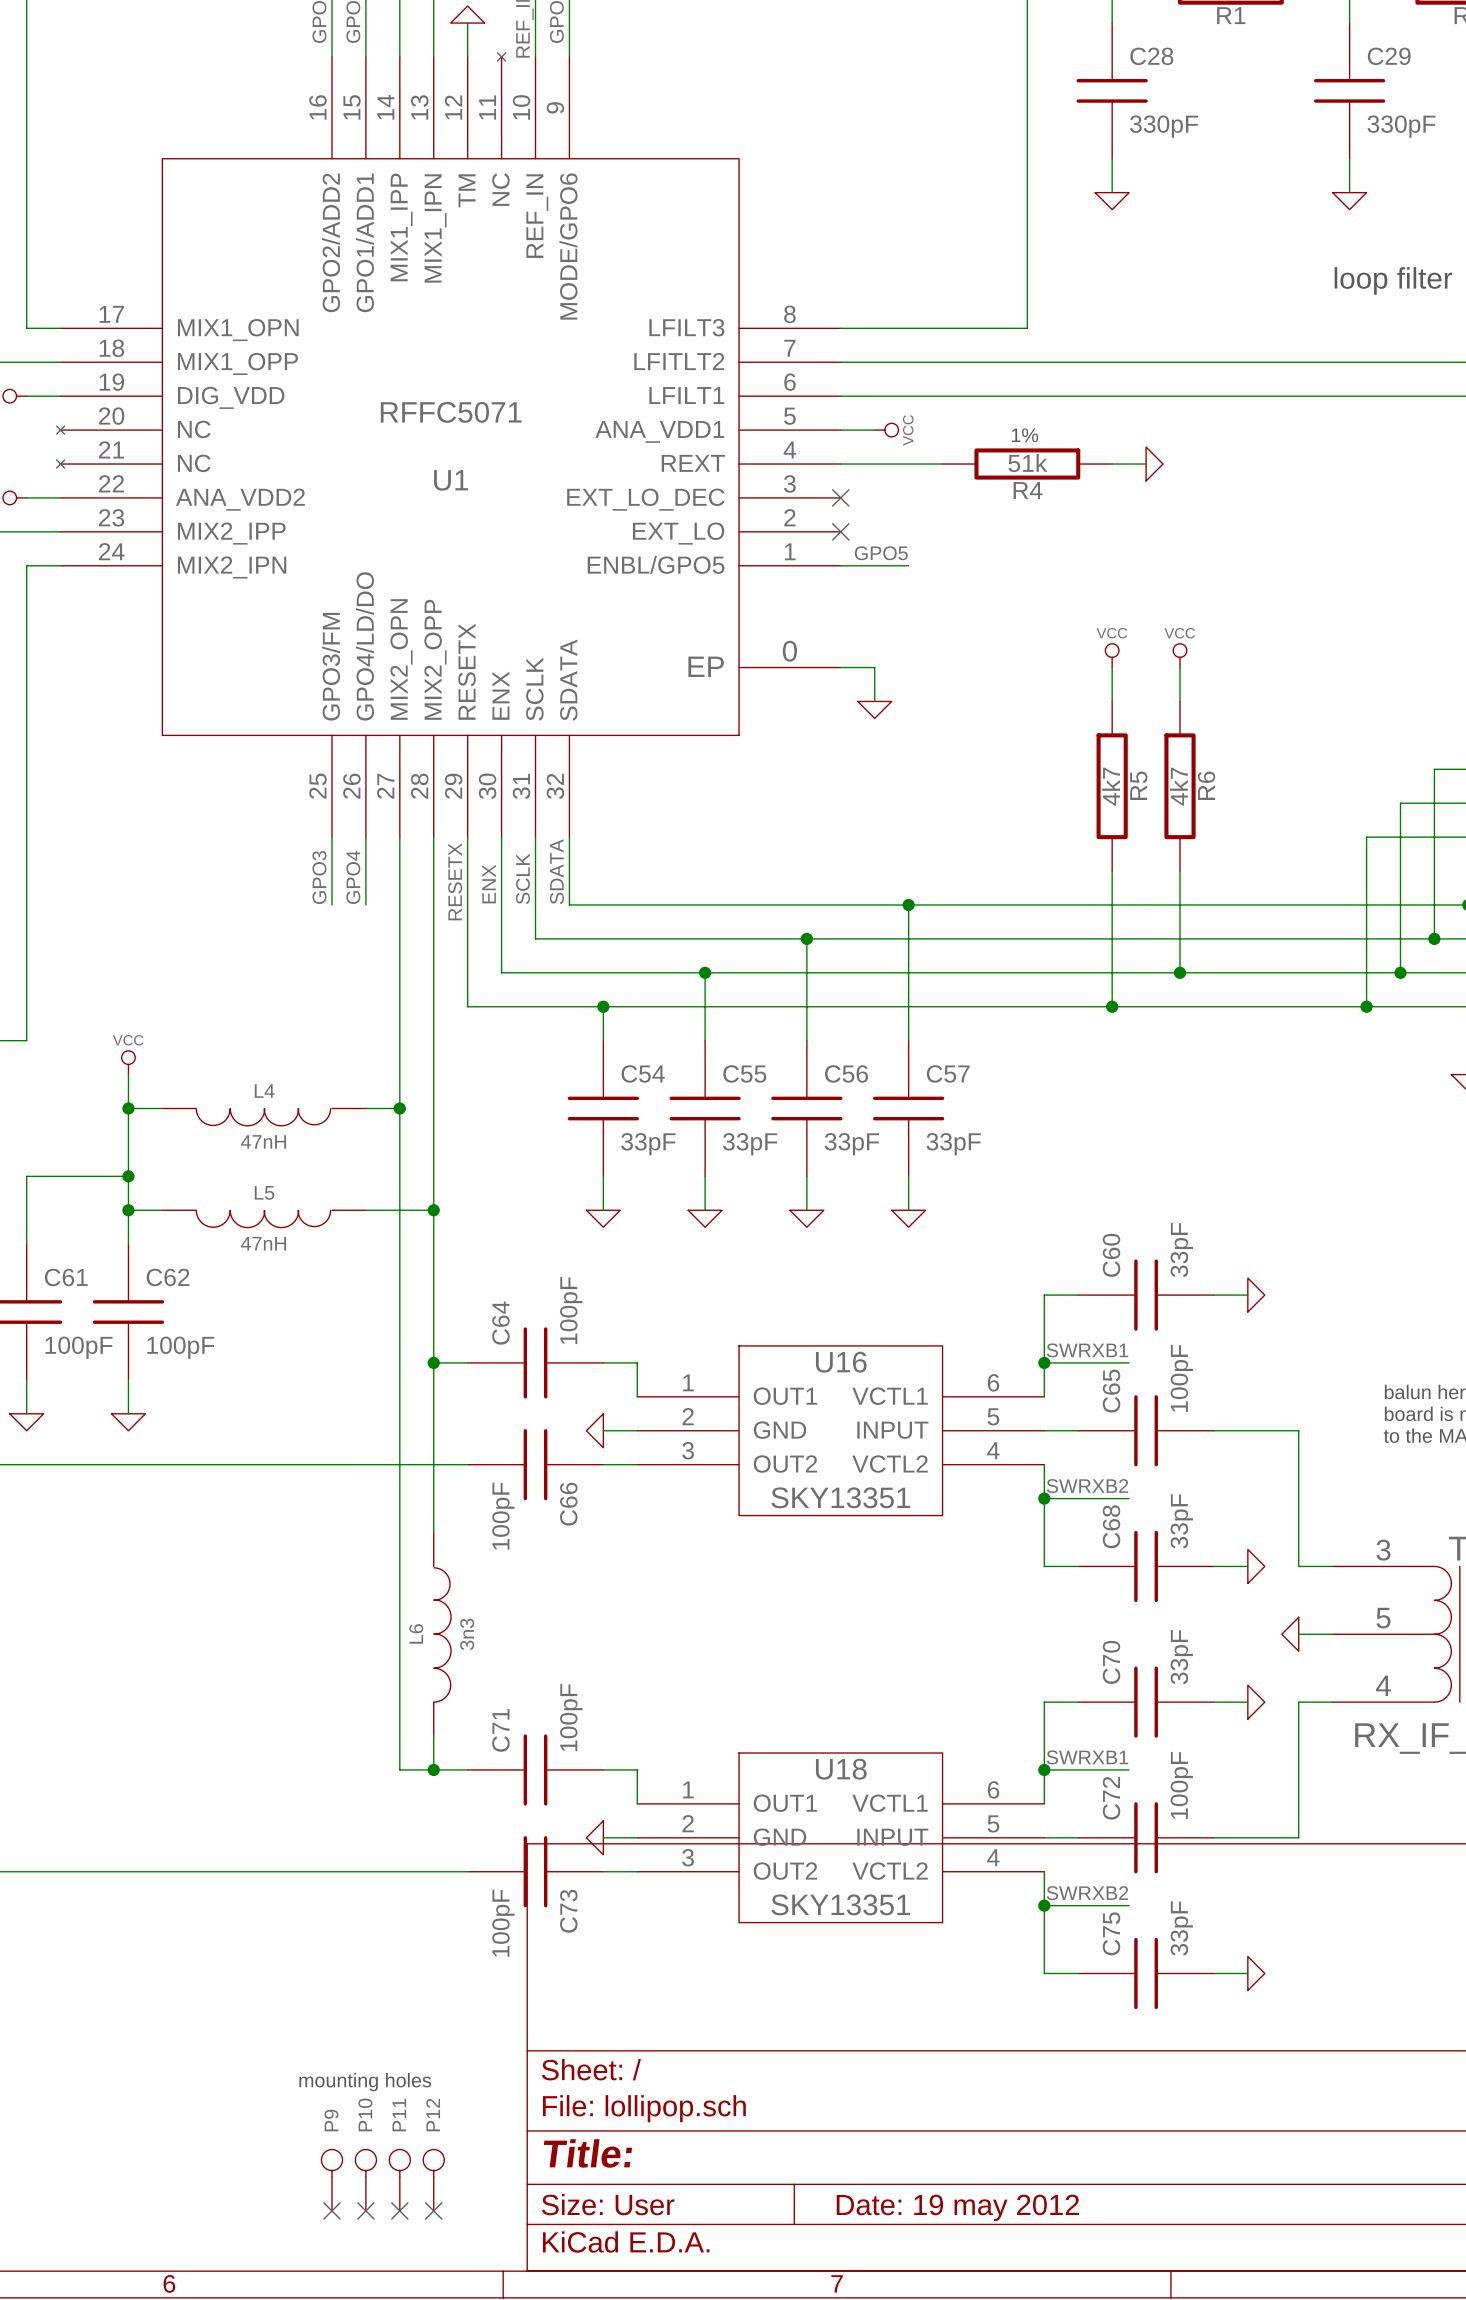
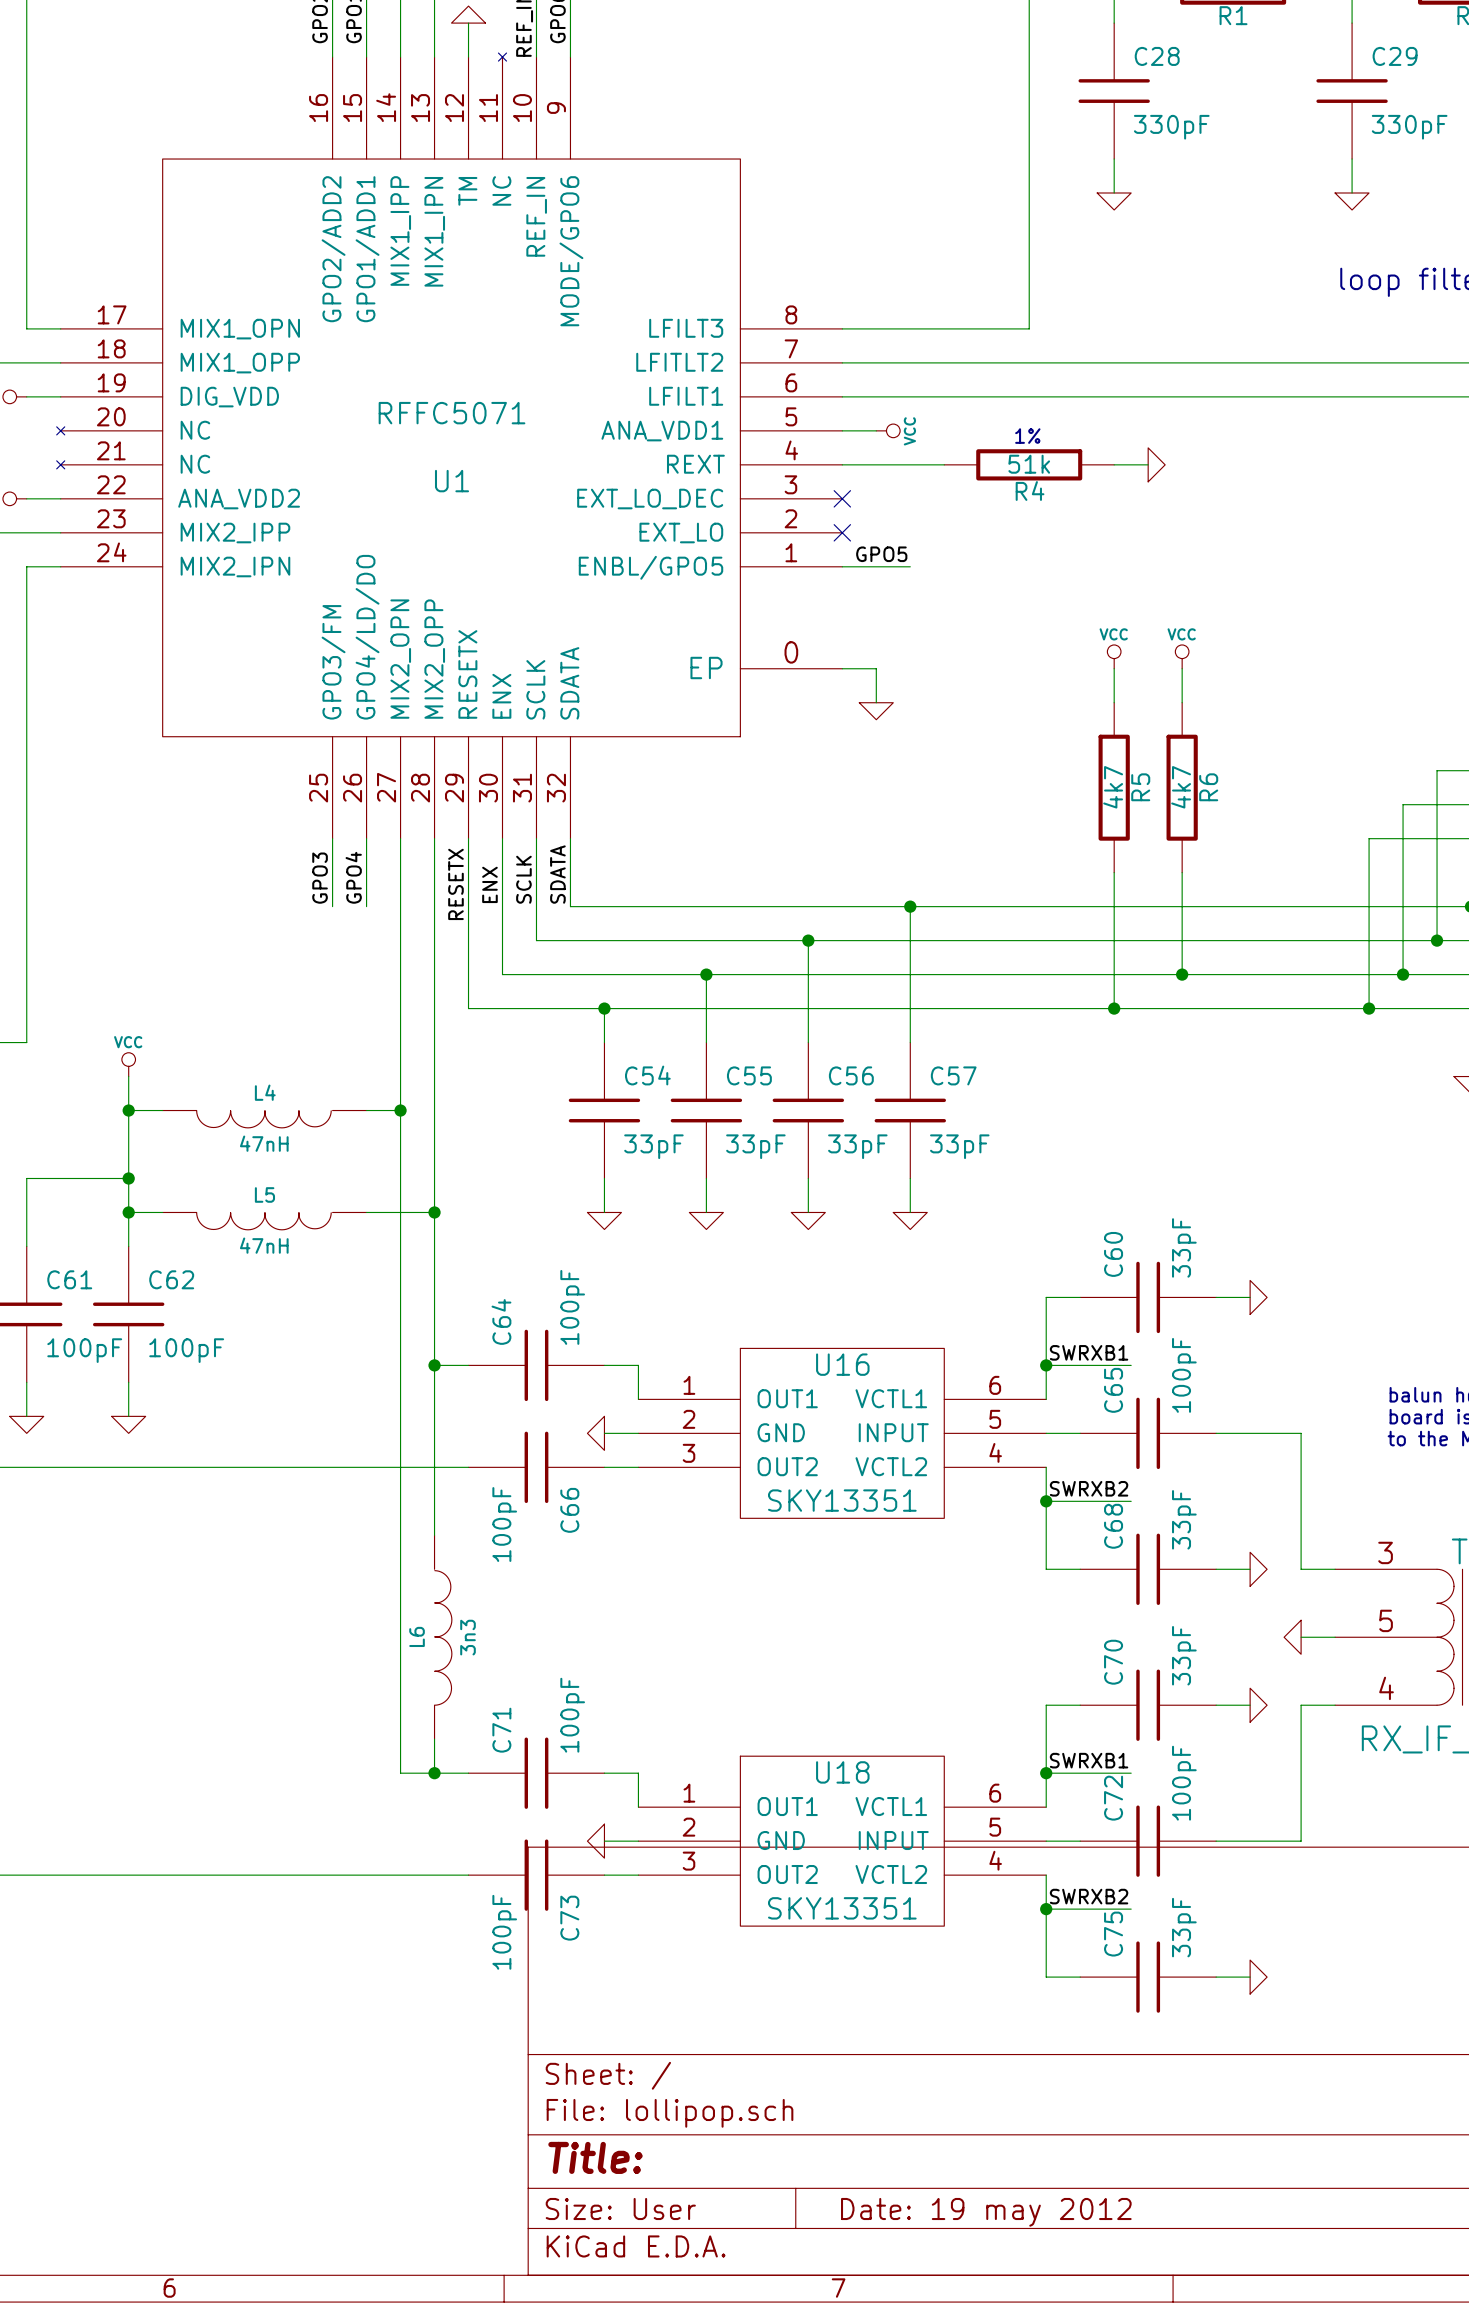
text: mounting holes (365, 2082) -> none
P9: (331, 2180) -> none
P10: (365, 2180) -> none
P11: (399, 2180) -> none
P12: (433, 2180) -> none
no-connect mark: (331, 2210) -> none
no-connect mark: (365, 2210) -> none
no-connect mark: (399, 2210) -> none
no-connect mark: (433, 2210) -> none

